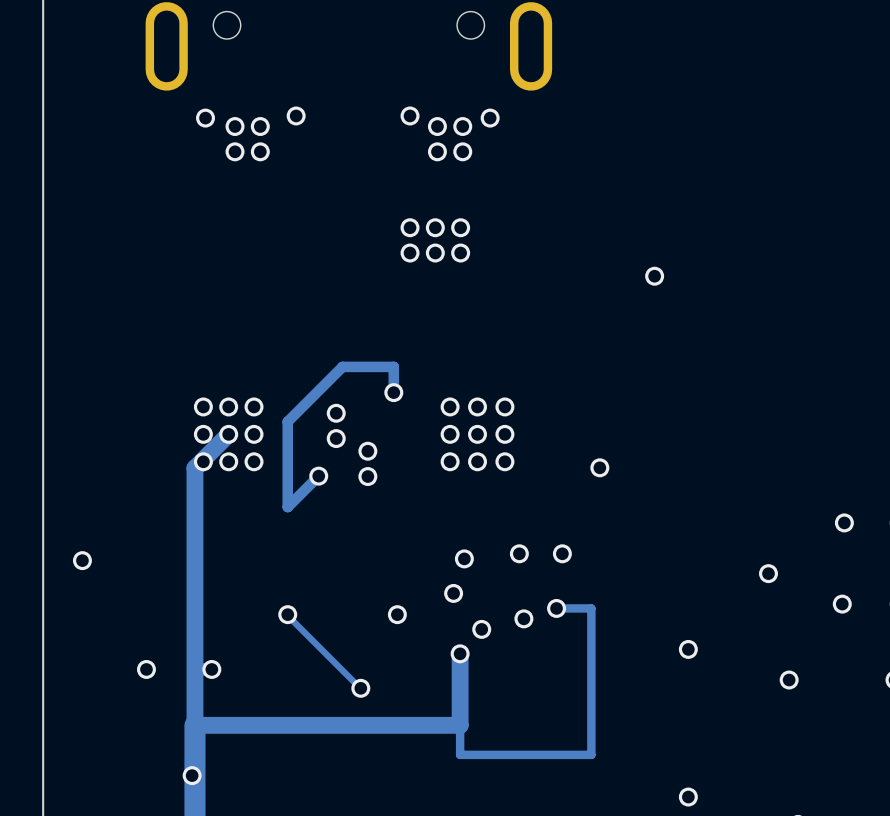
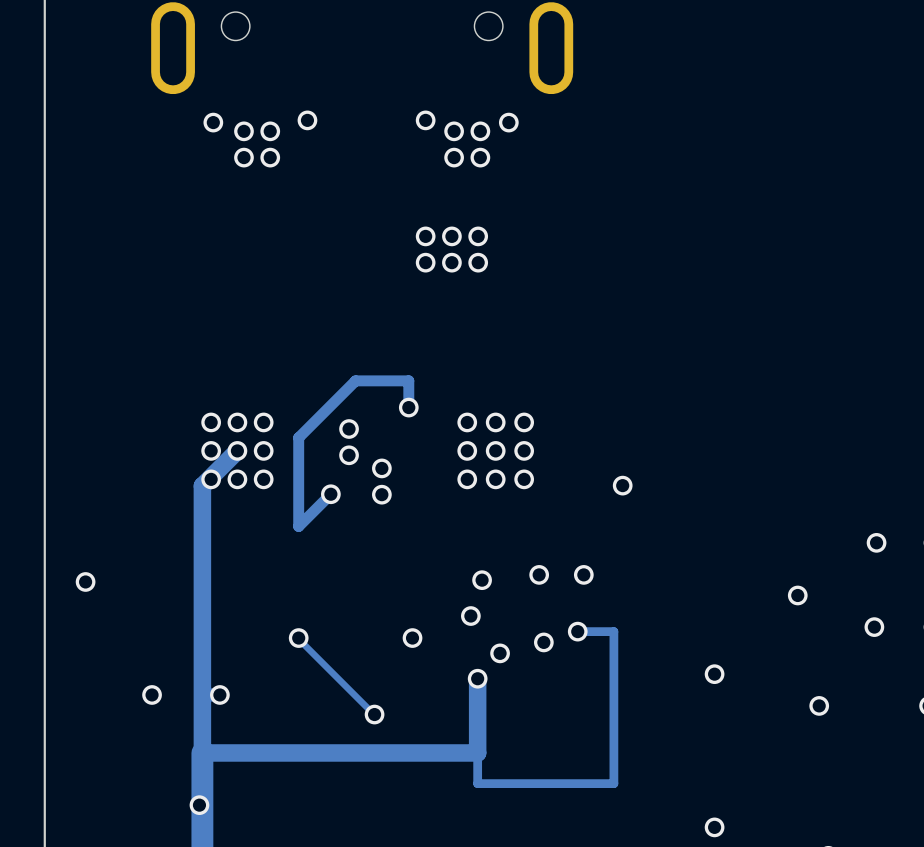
via: (654, 276) -> none

